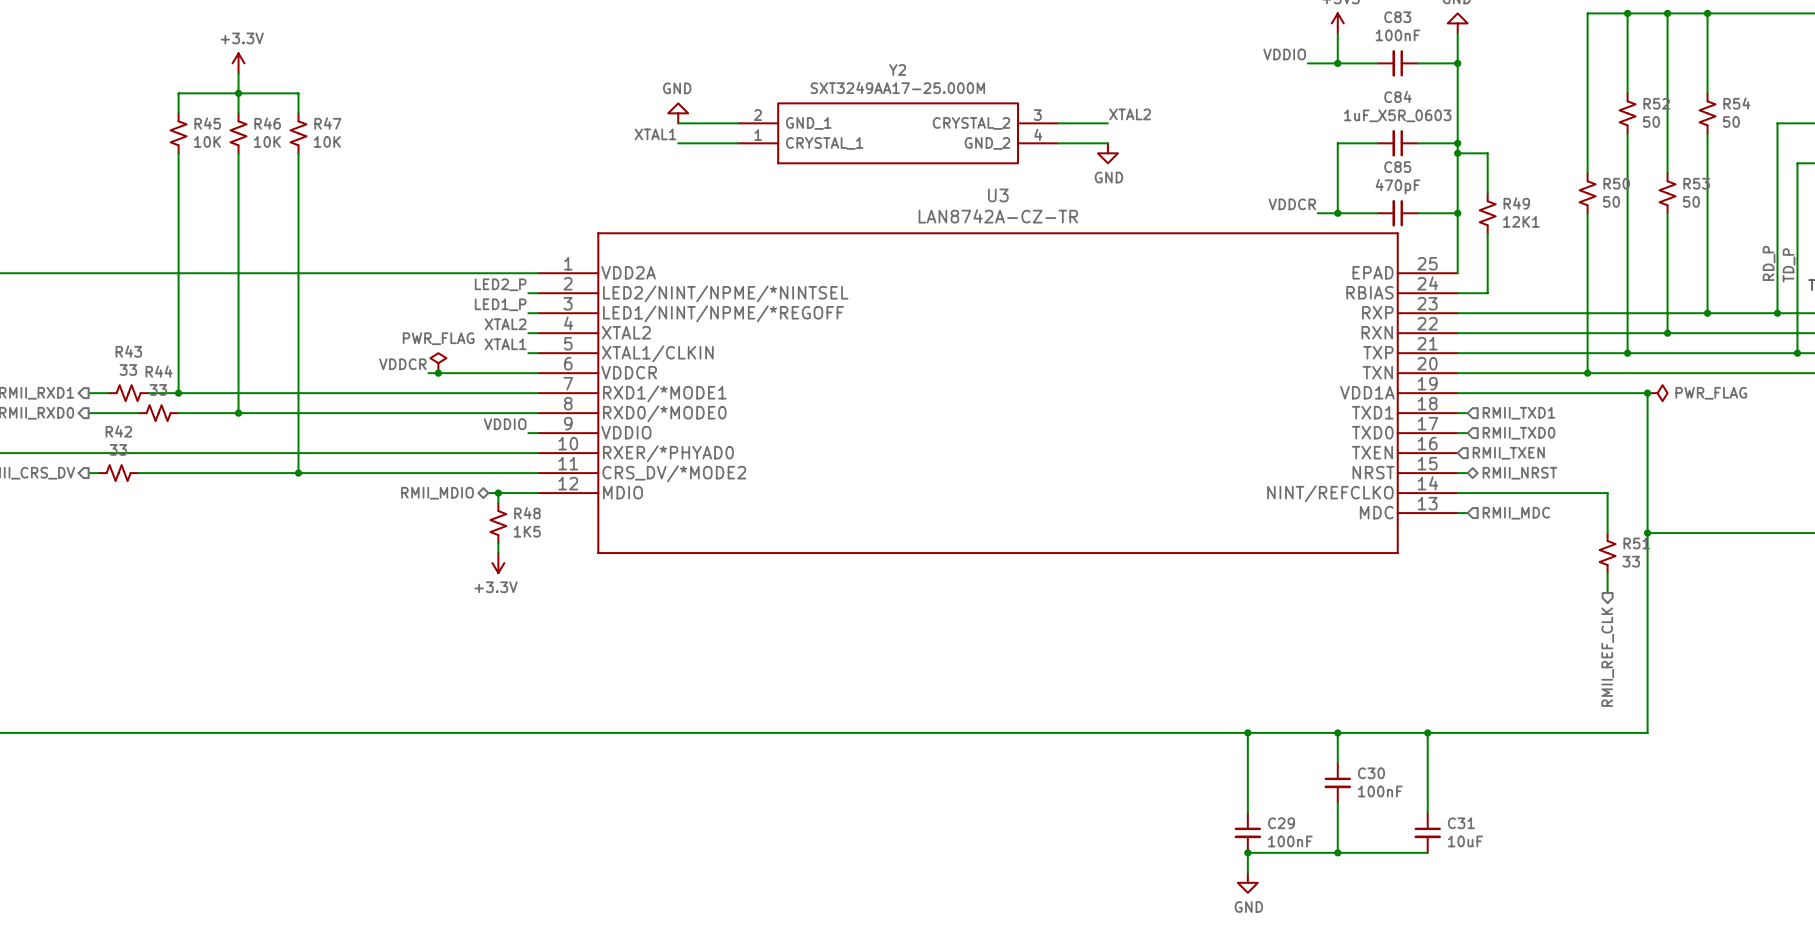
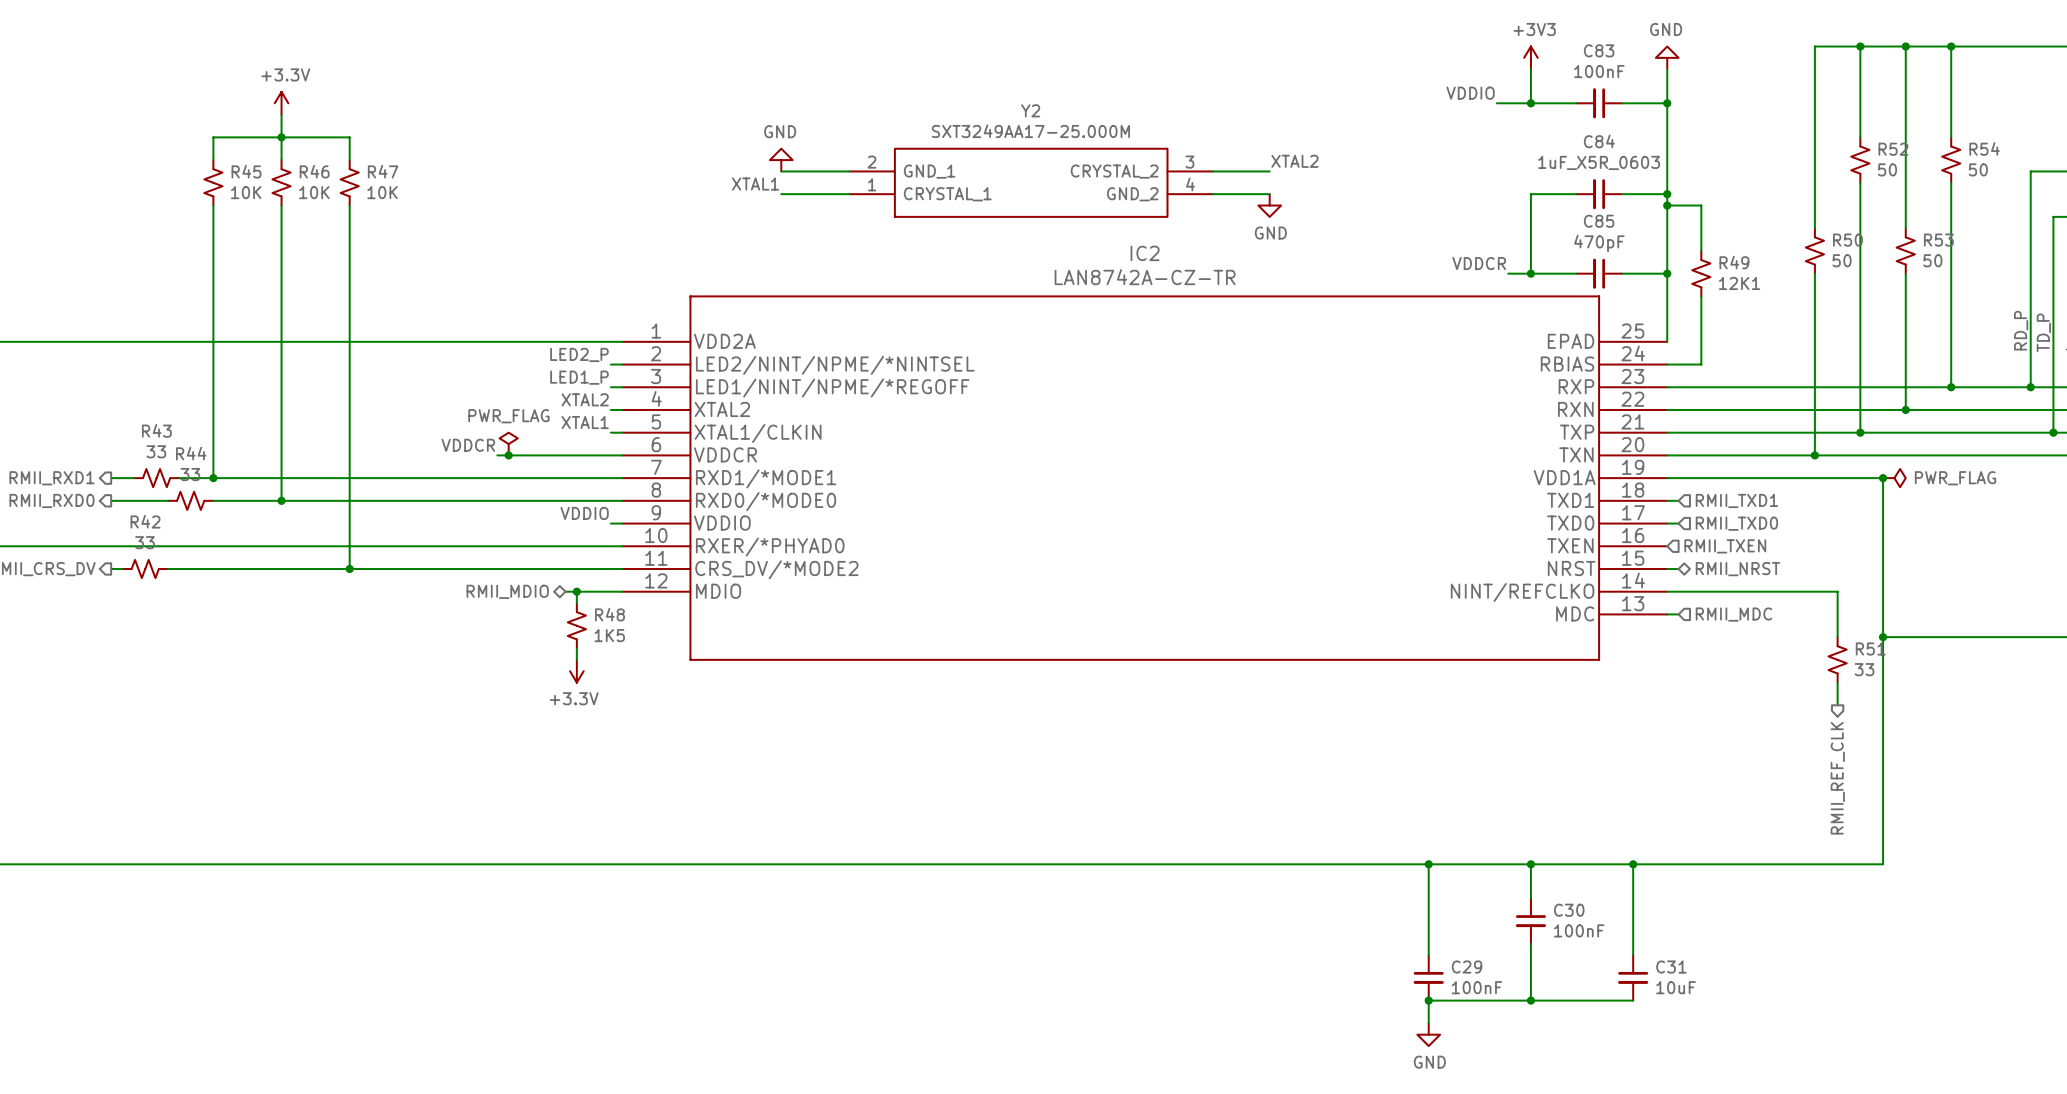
U3 name: U3 (998, 195) -> IC2 (1145, 253)

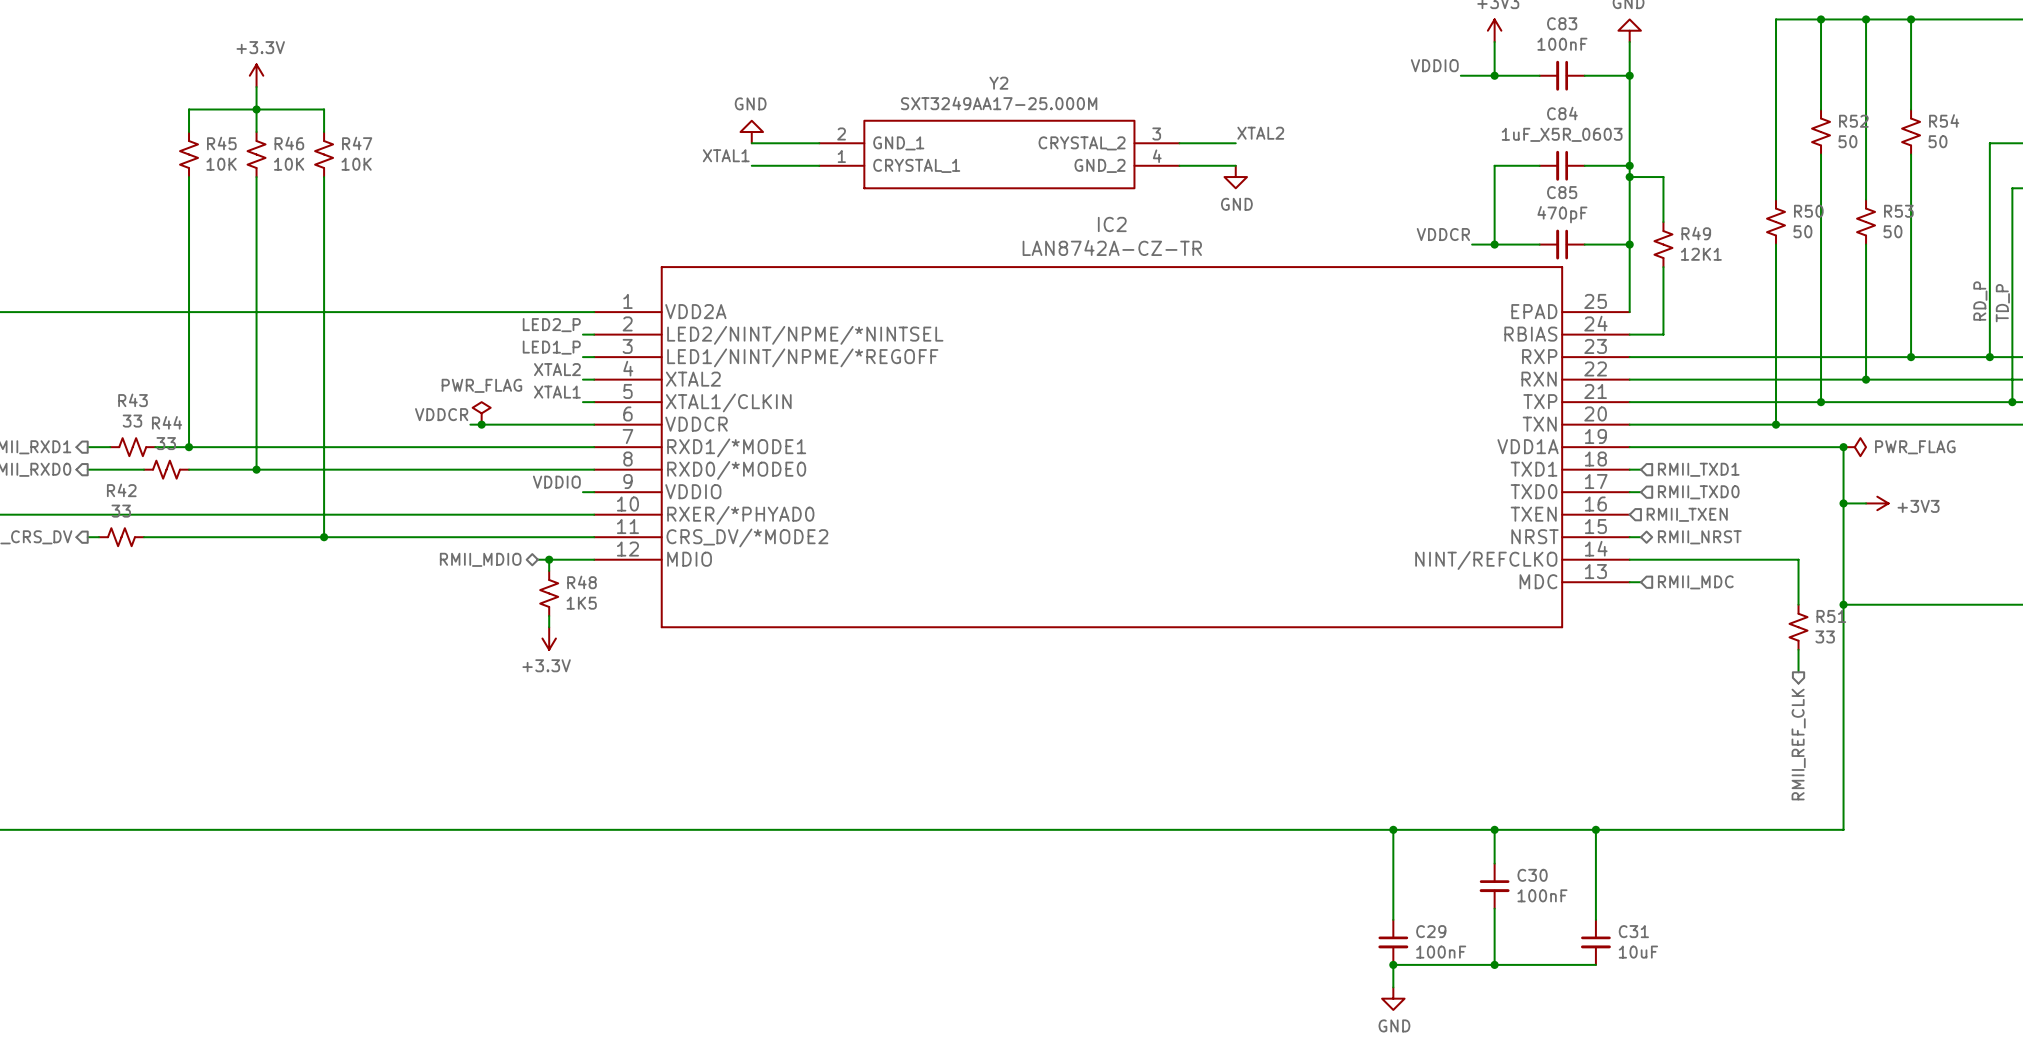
wire: none -> (1843, 503) (1866, 503)
junction: none -> (1843, 503)
power symbol: none -> +3V3 (1877, 503)

